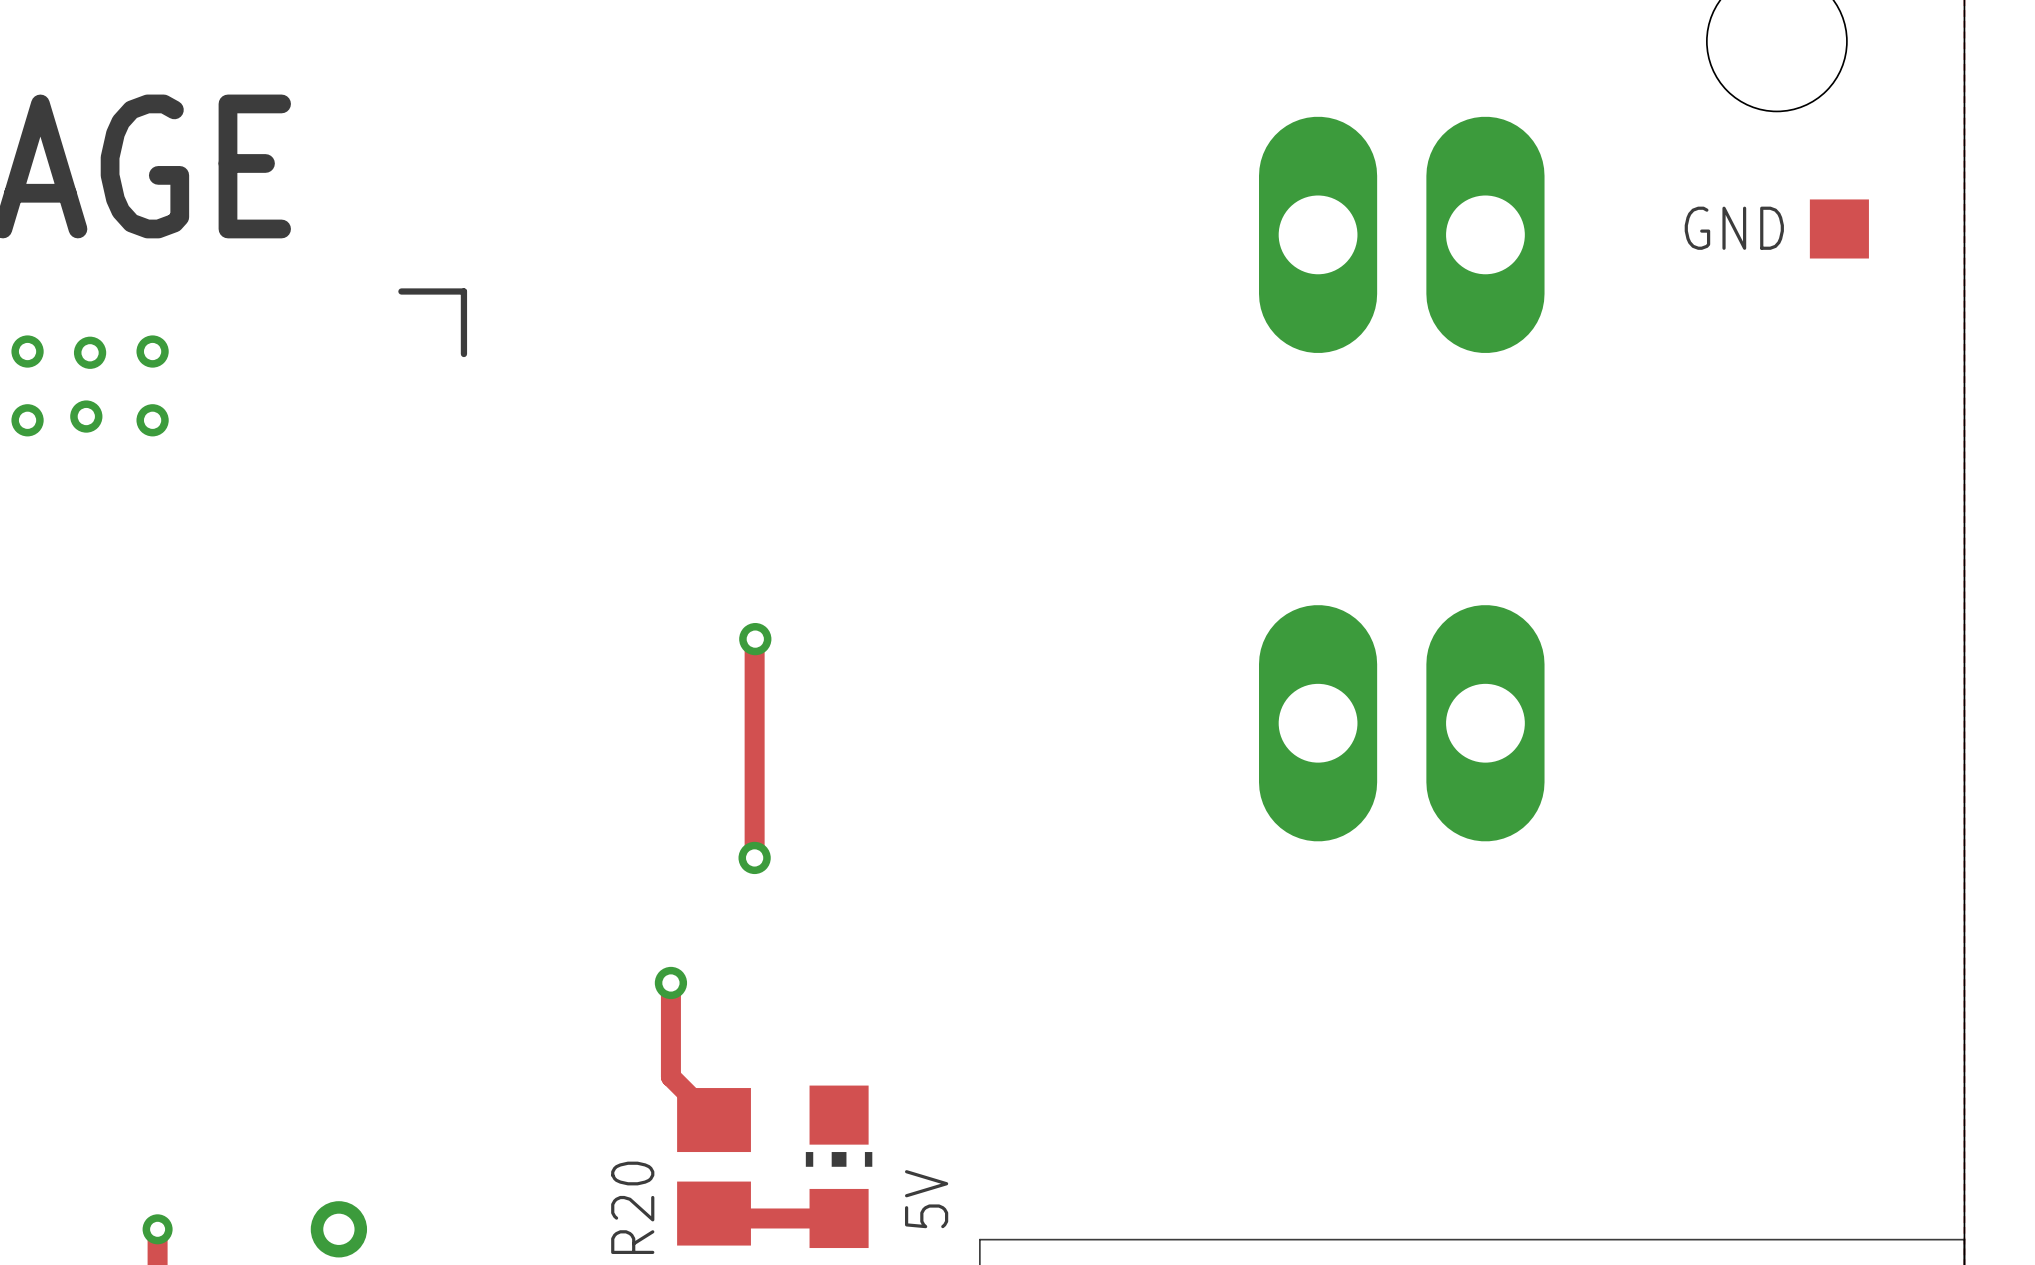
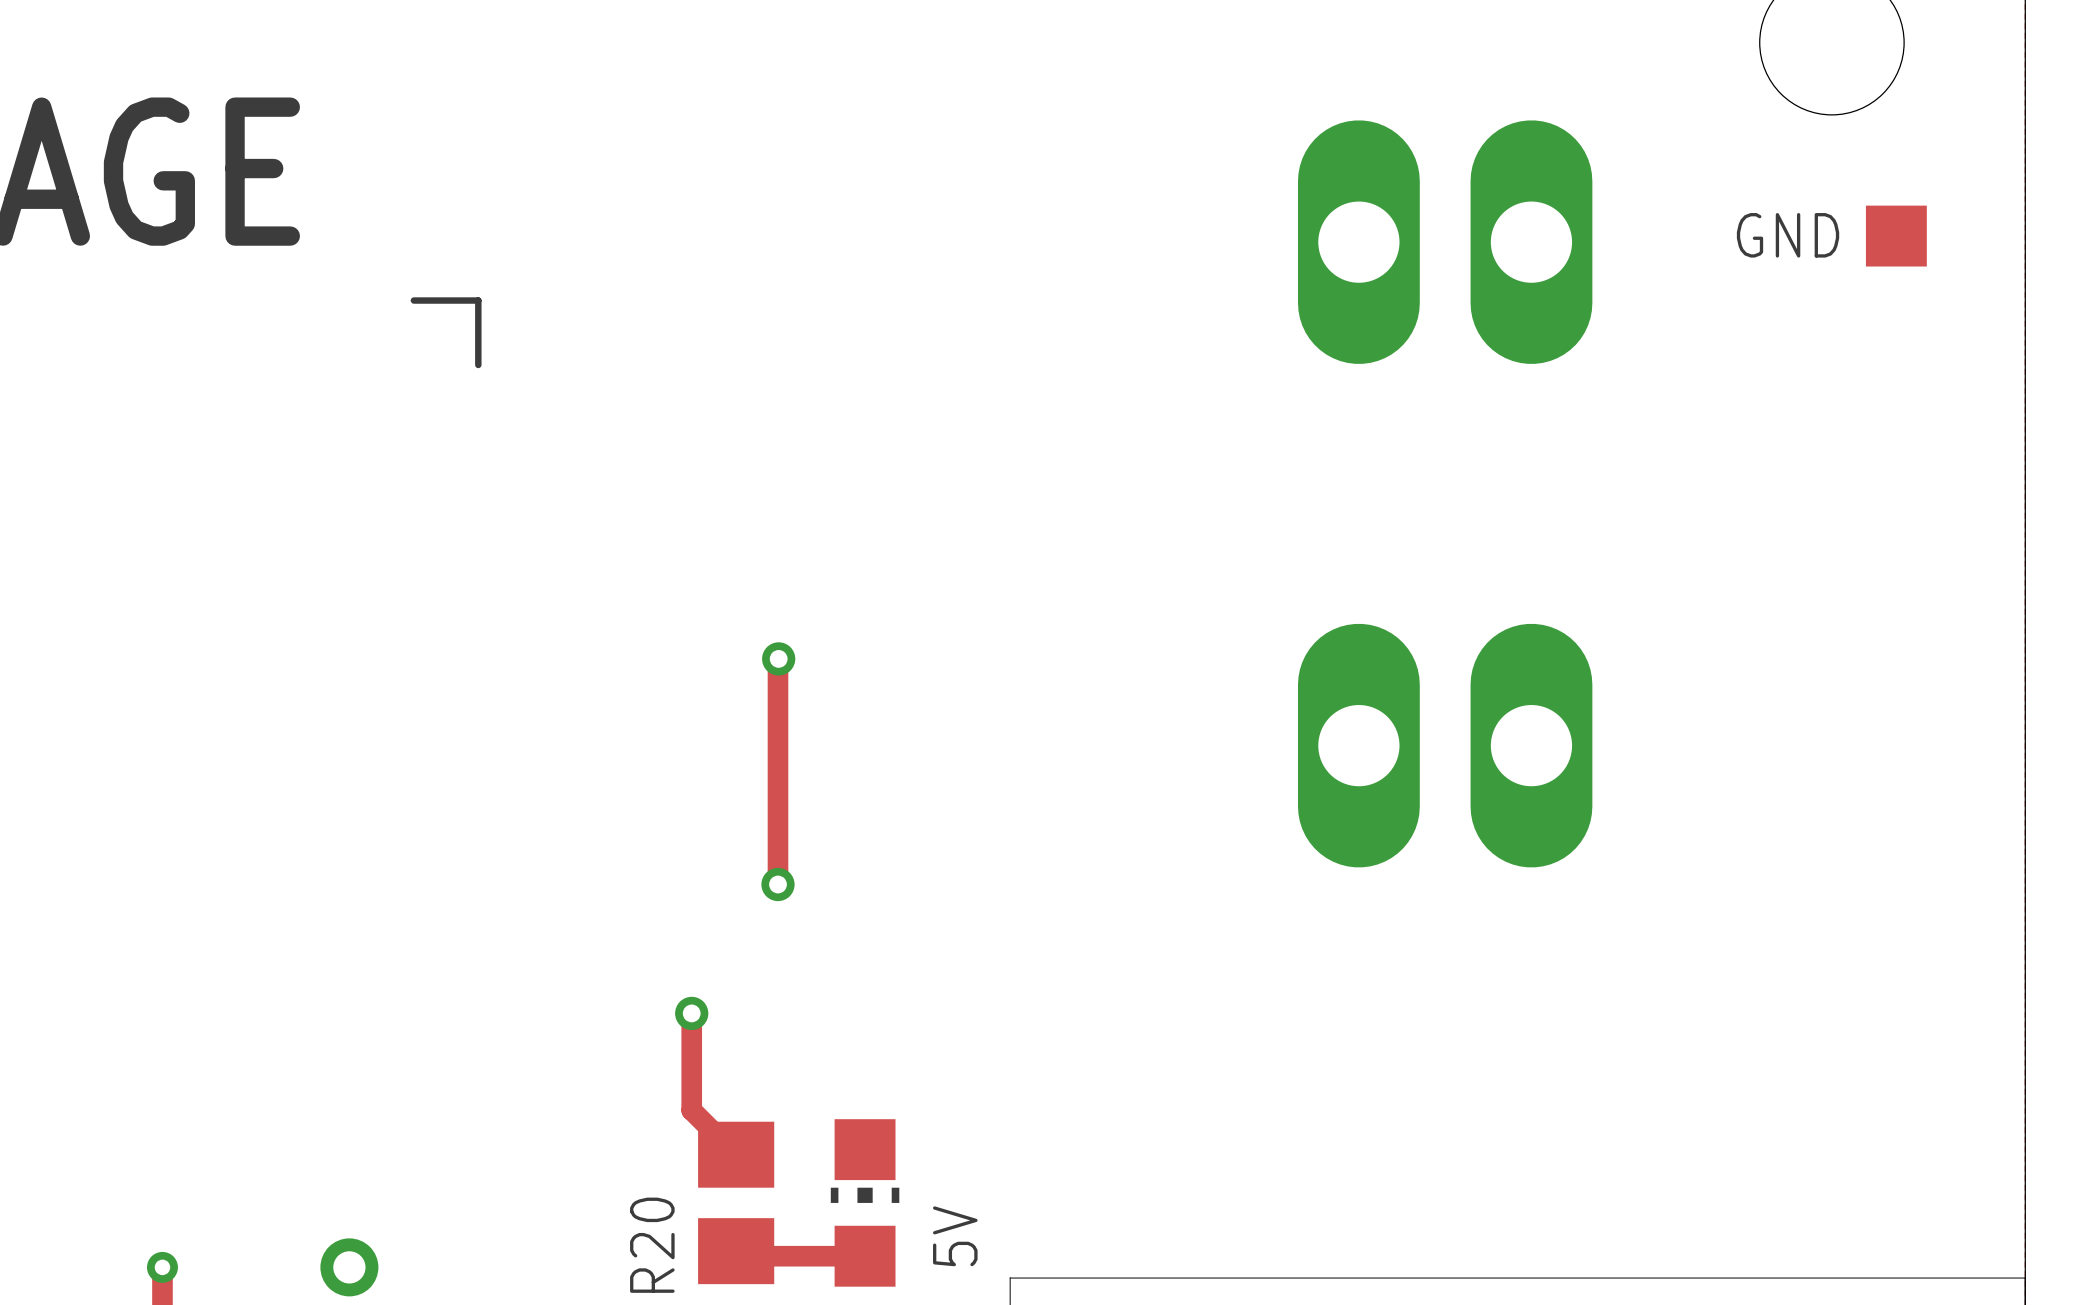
via: (27, 351) -> none
via: (152, 351) -> none
via: (90, 352) -> none
via: (86, 416) -> none
via: (27, 420) -> none
via: (152, 420) -> none

